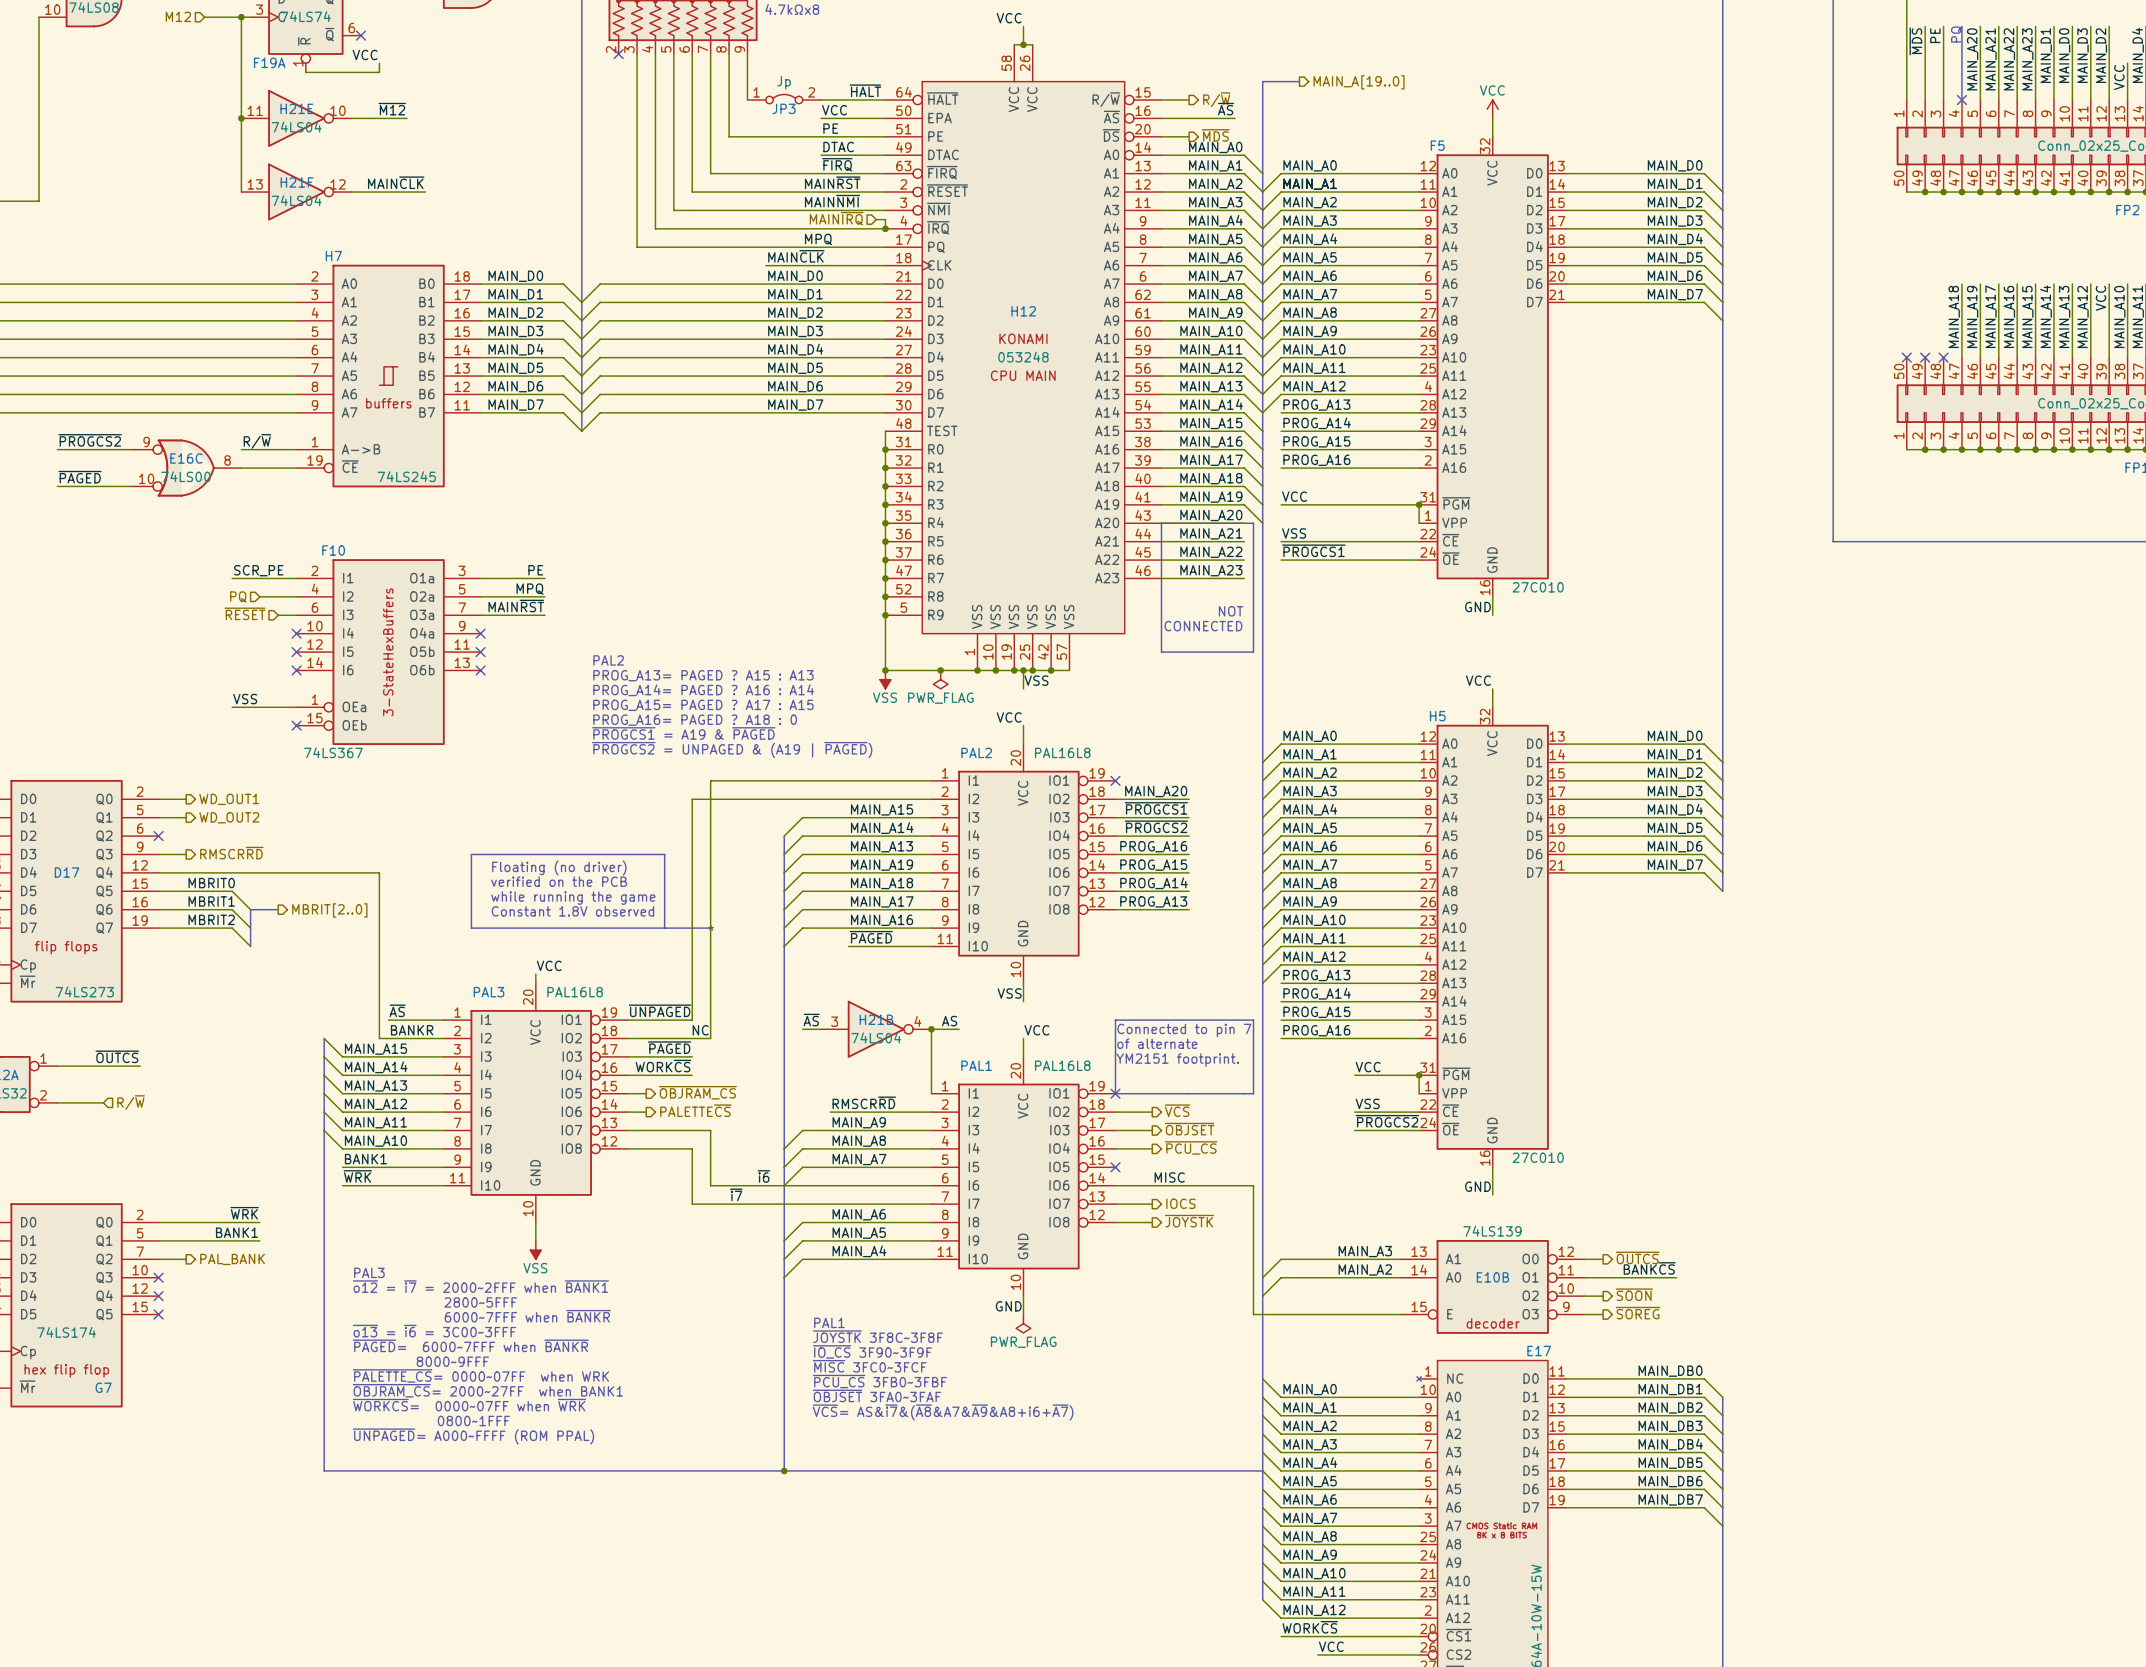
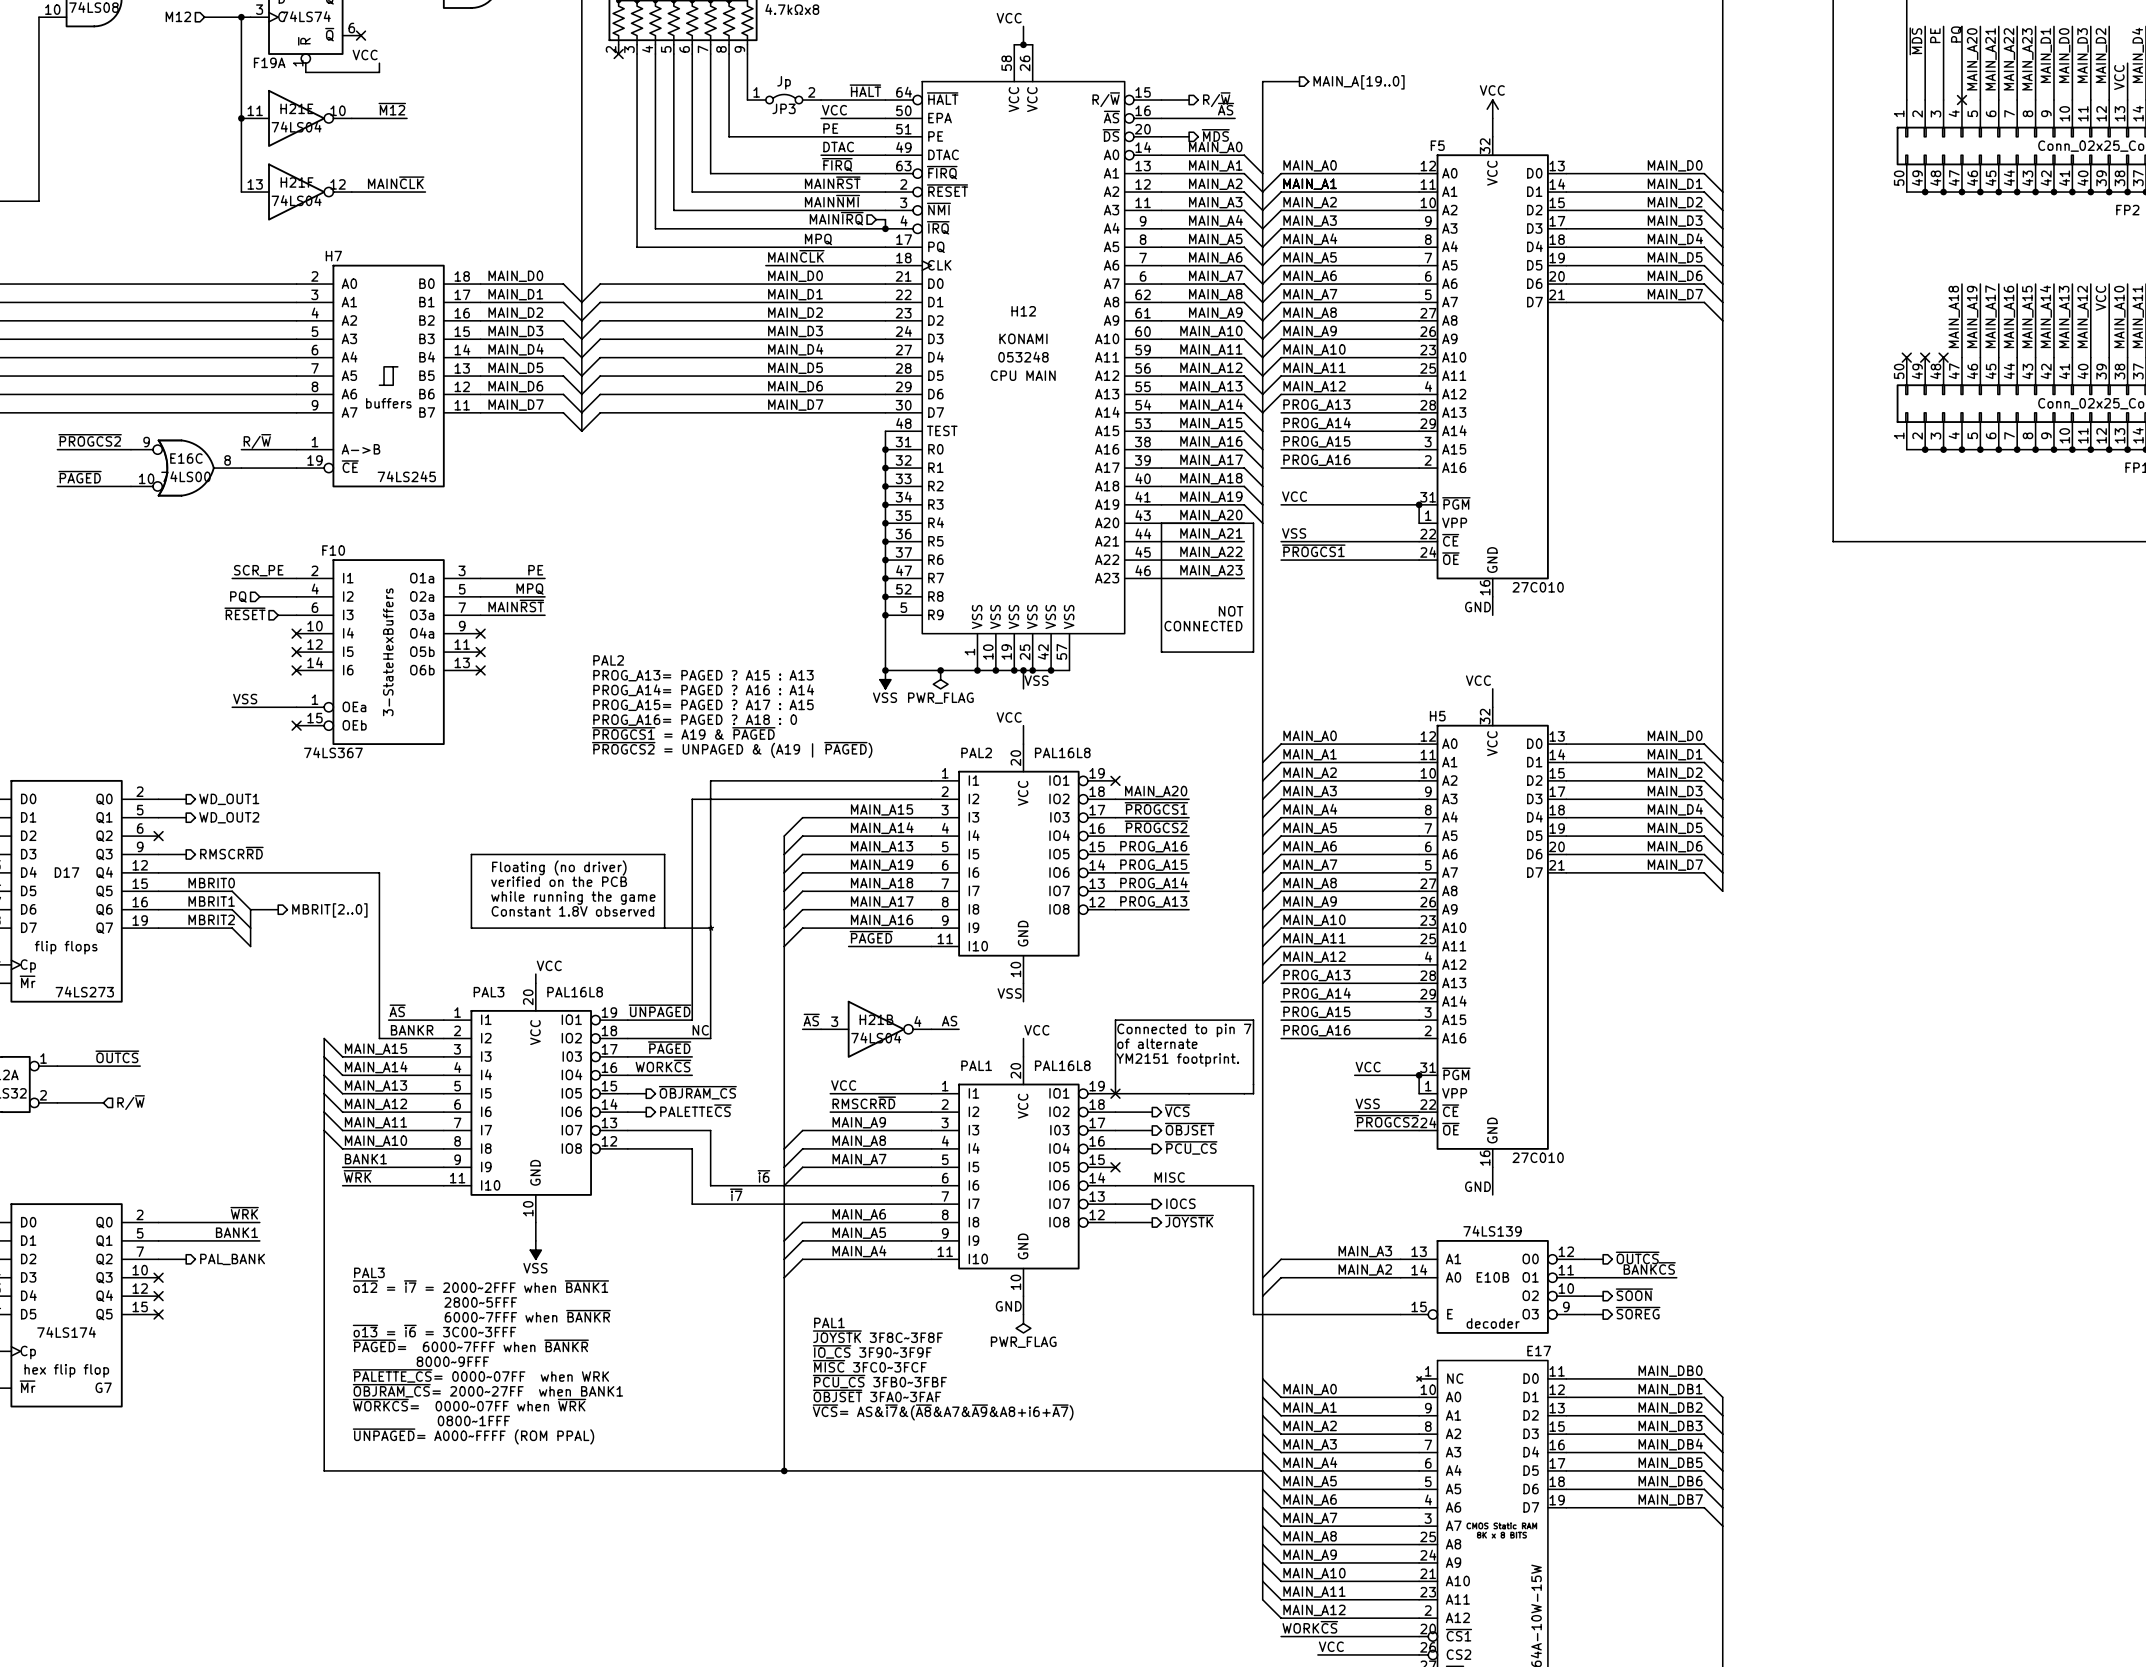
wire: (931, 1029) (931, 1093) -> (830, 1093) (931, 1093)
junction: (931, 1029) -> none
label: none -> VCC (843, 1085)

